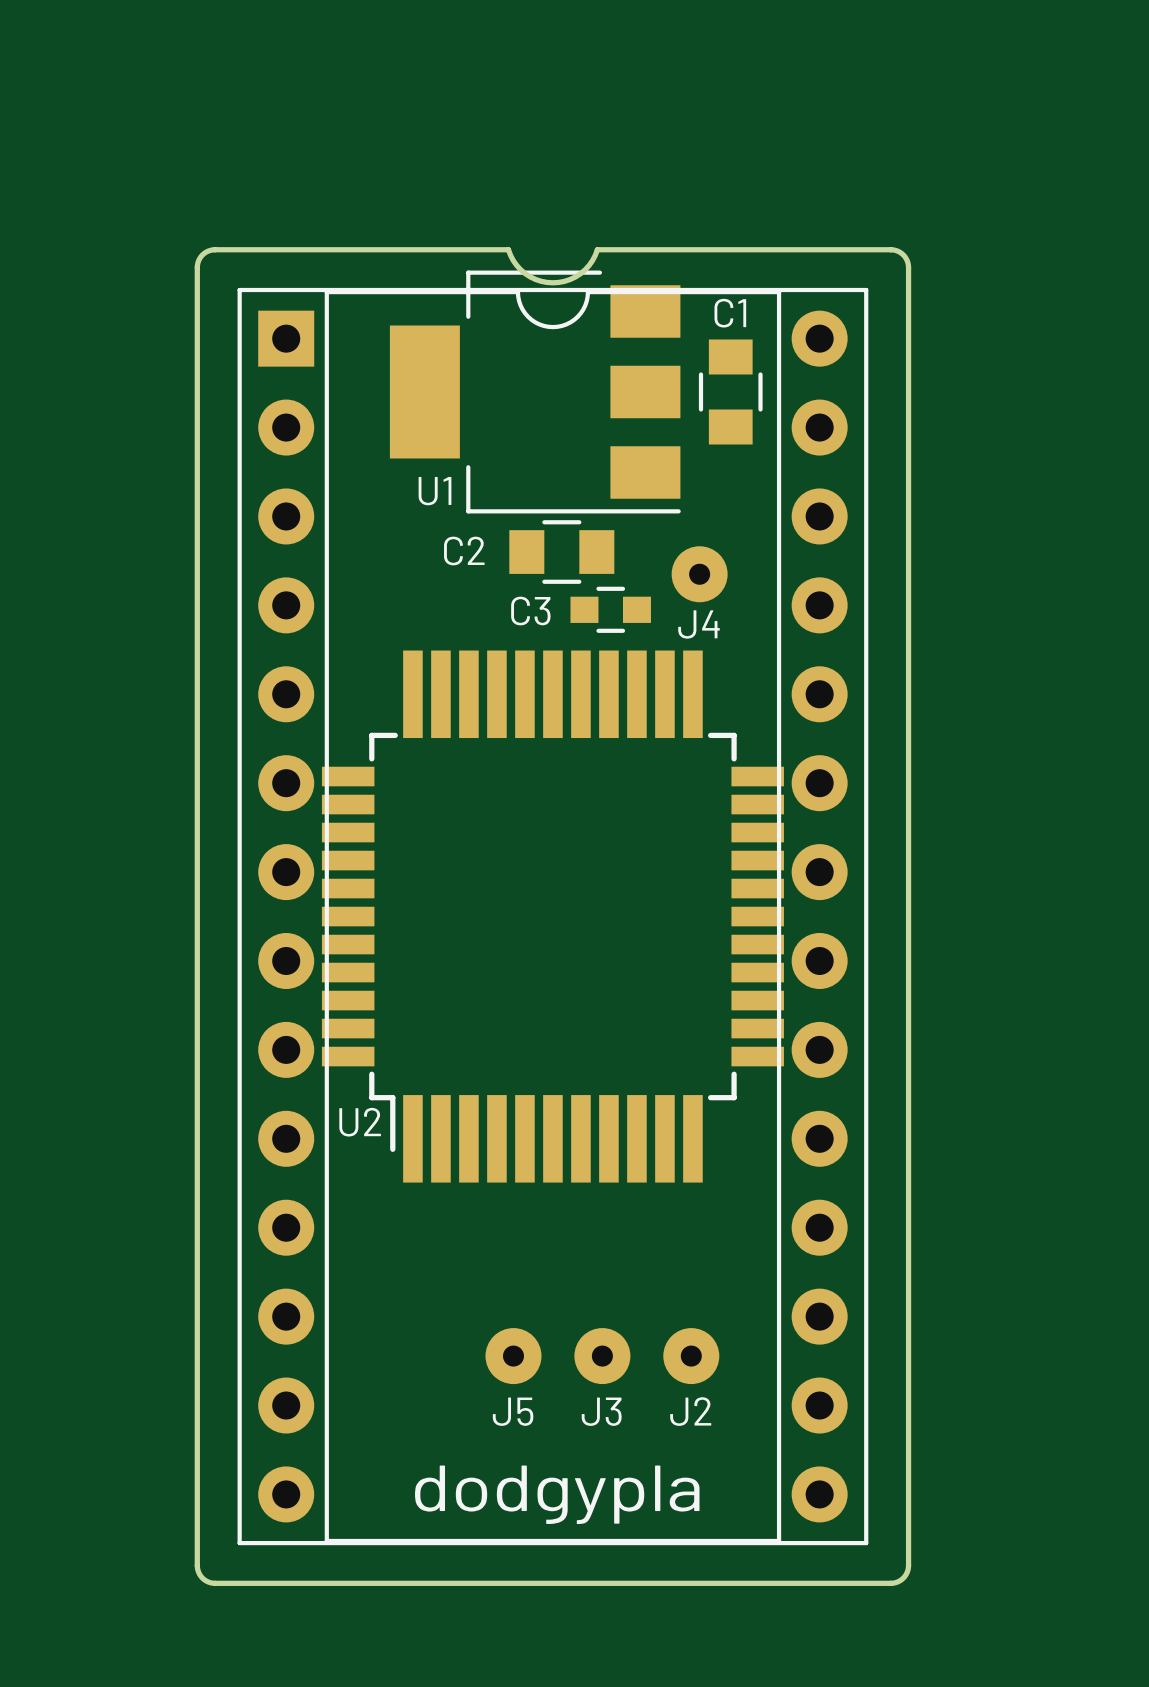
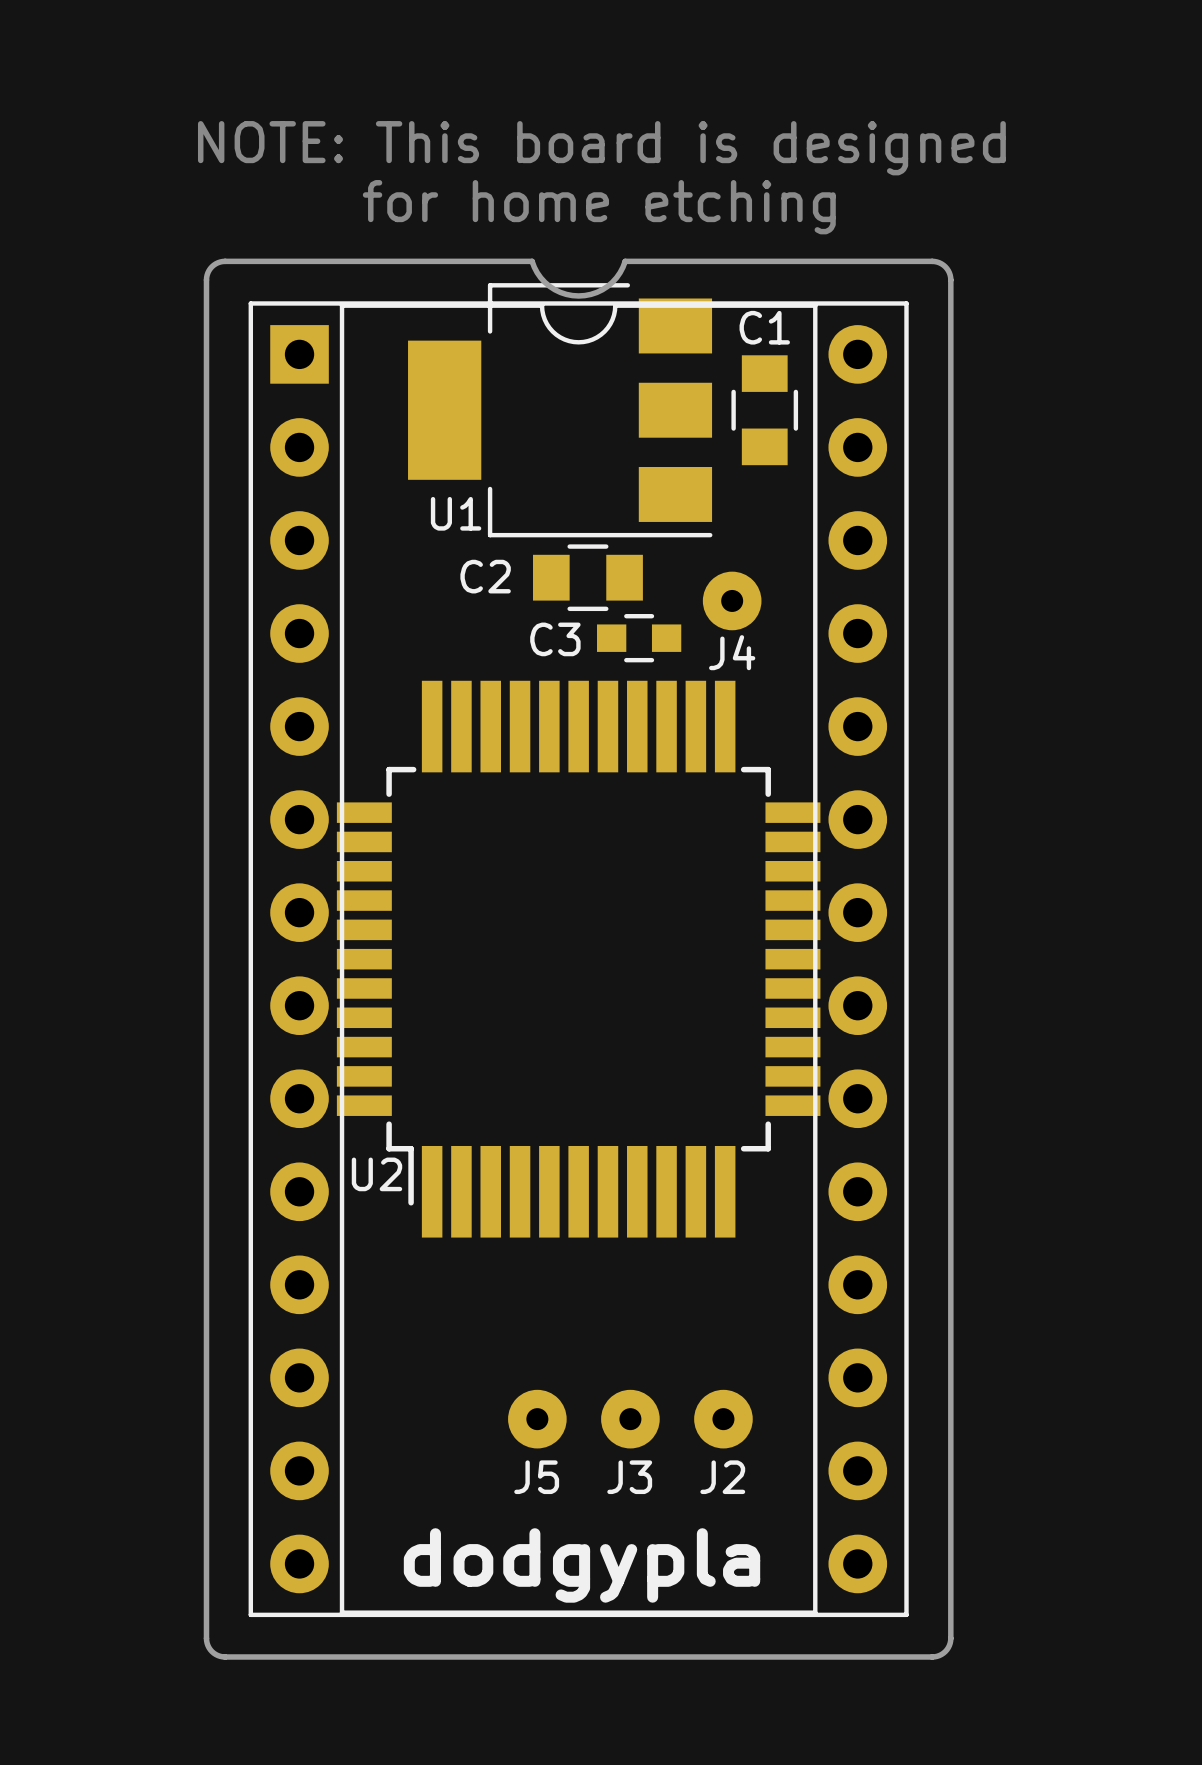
text: none -> NOTE: This board is designed (601, 148)
text: none -> for home etching (599, 207)

